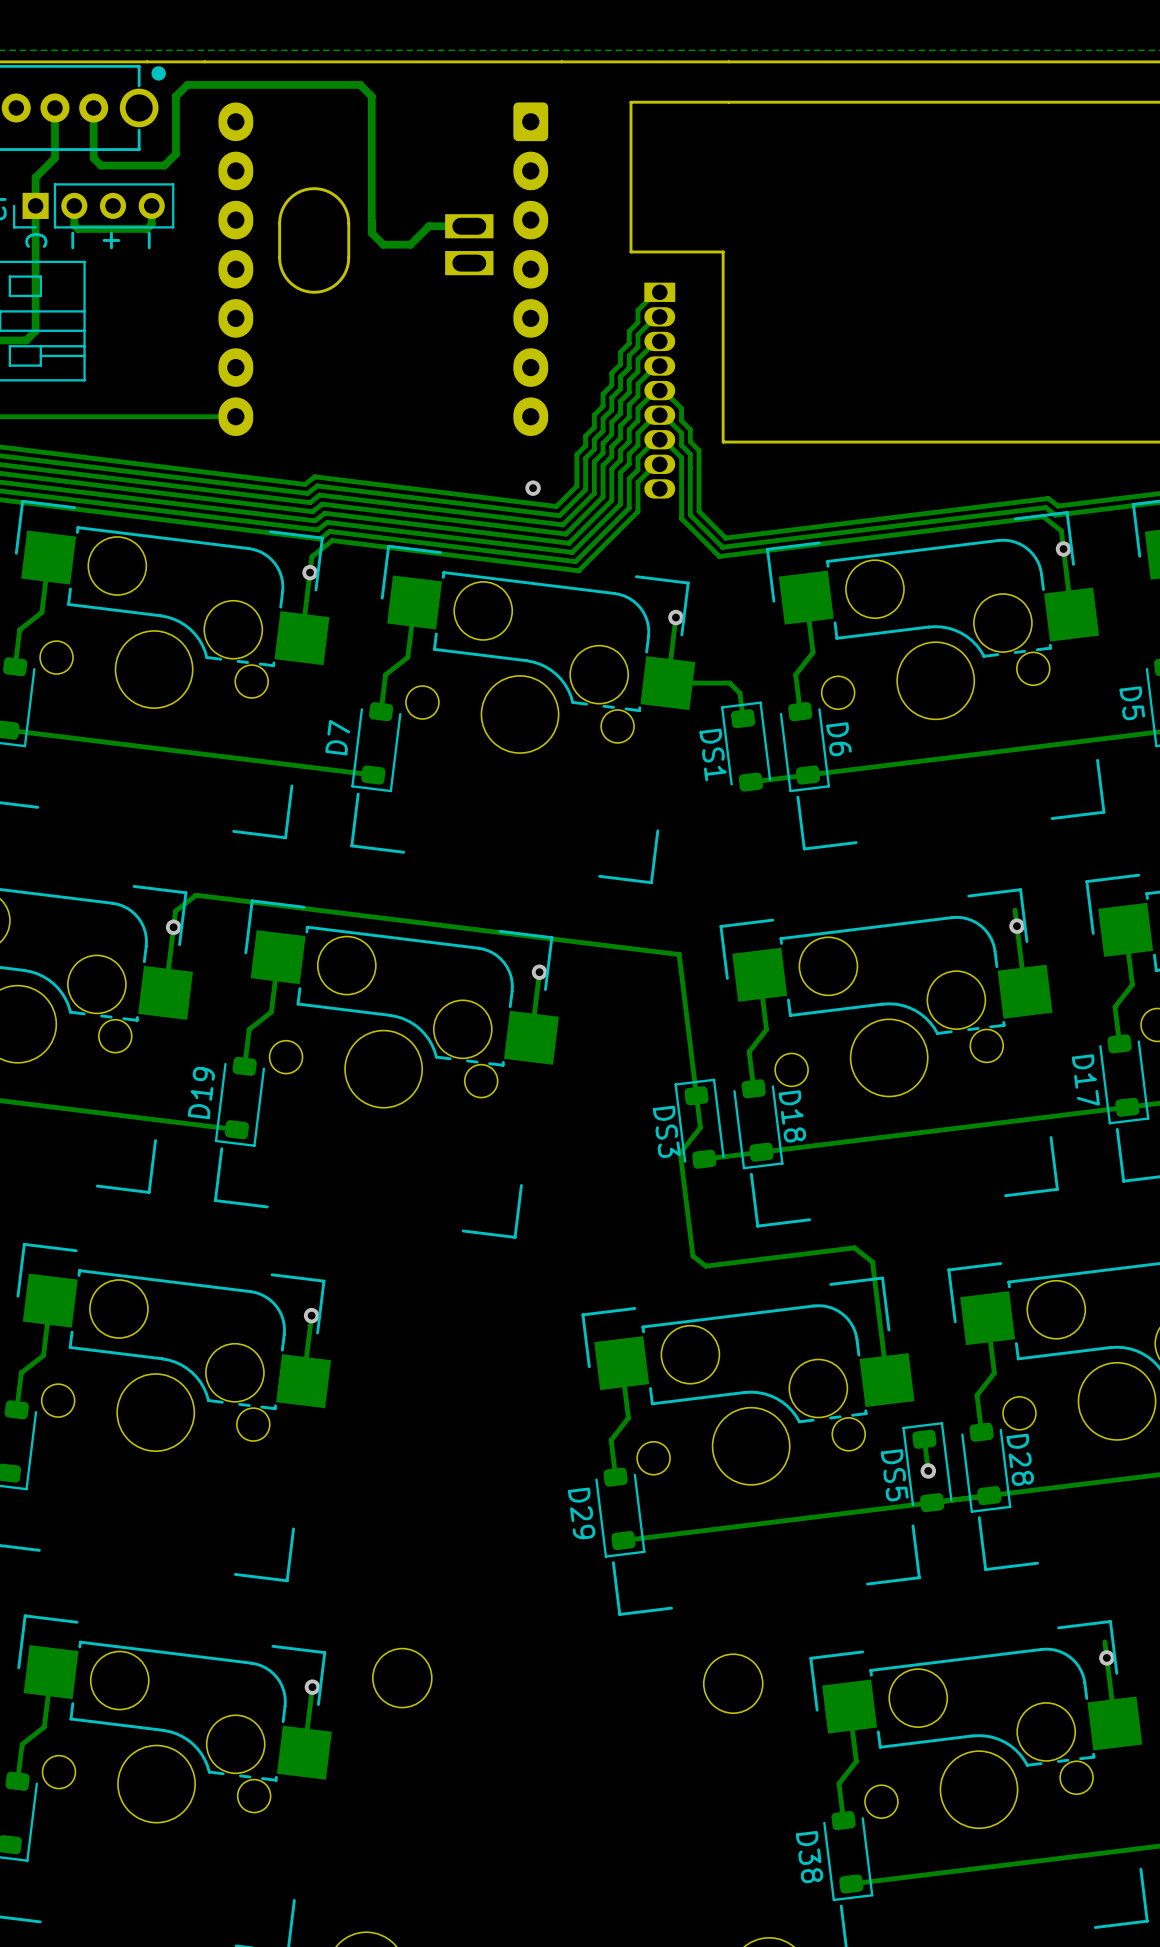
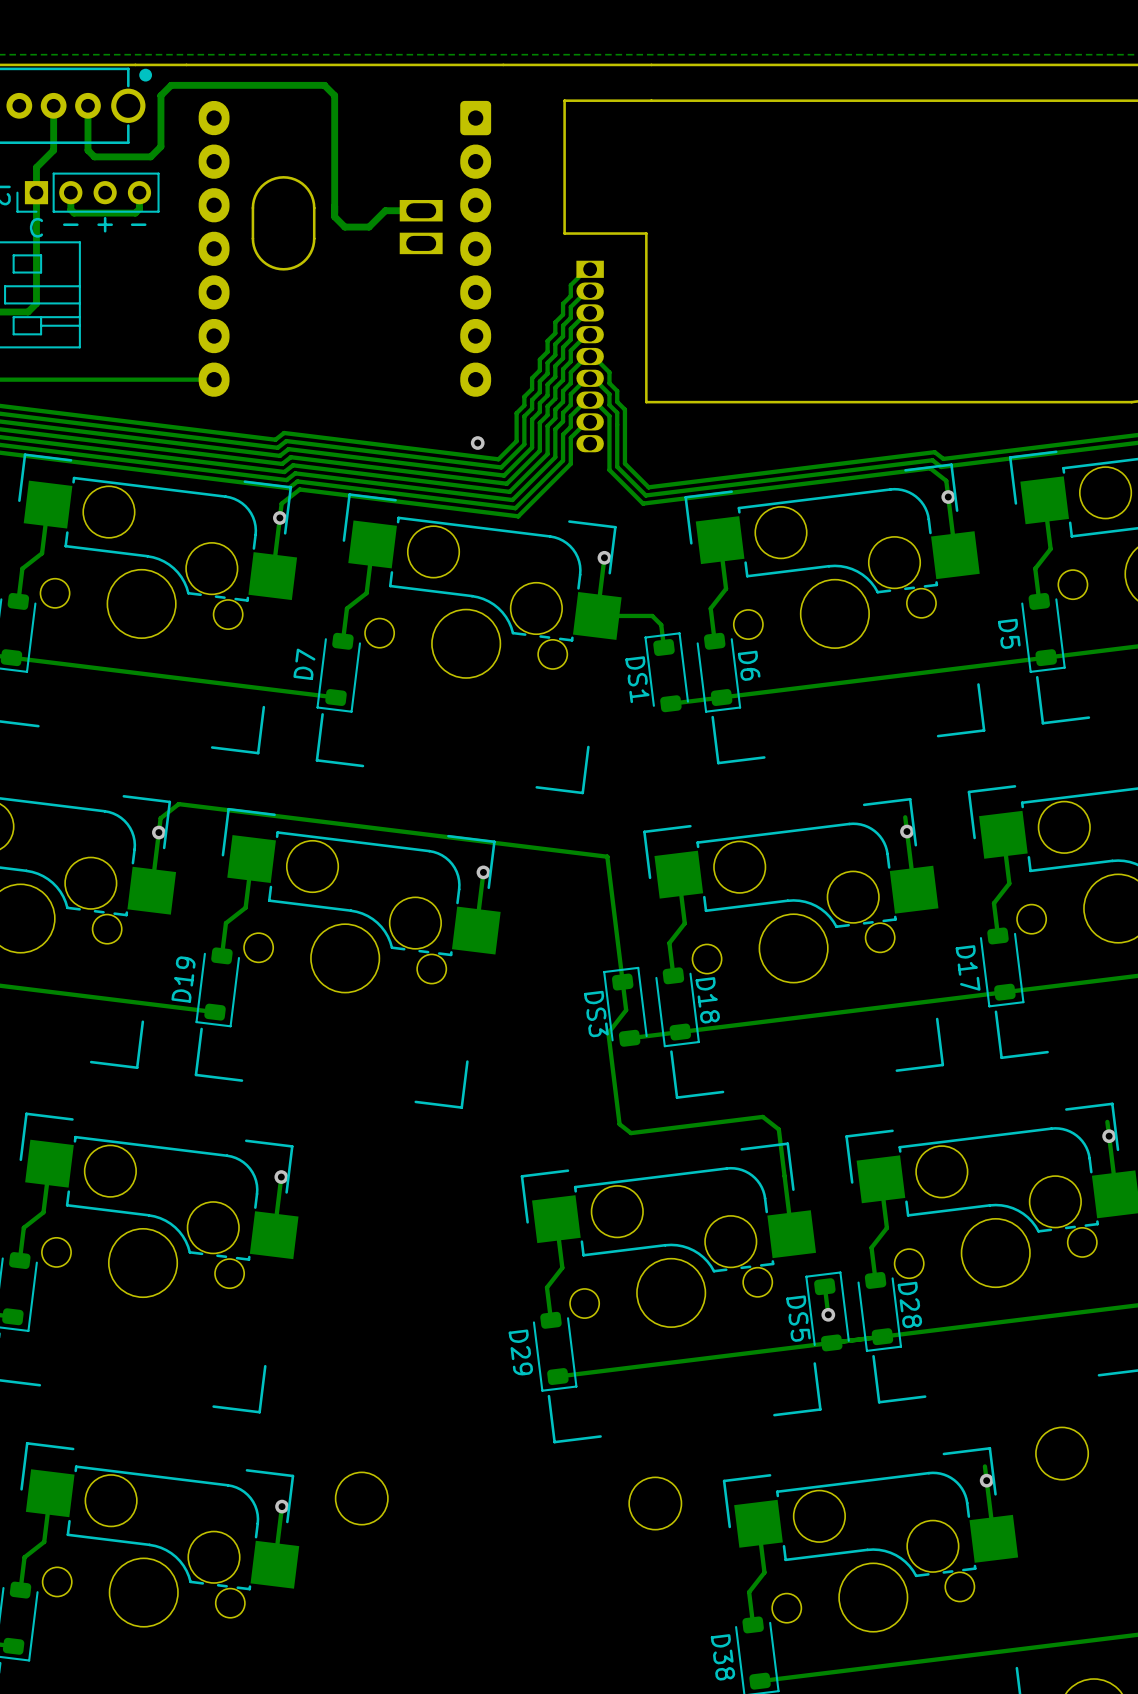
text rotation: 0° (36, 240) -> 90° counterclockwise (36, 227)
text rotation: 0° (72, 240) -> 90° counterclockwise (70, 224)
text rotation: 0° (111, 240) -> 90° counterclockwise (105, 224)
text rotation: 0° (149, 240) -> 90° counterclockwise (138, 224)

